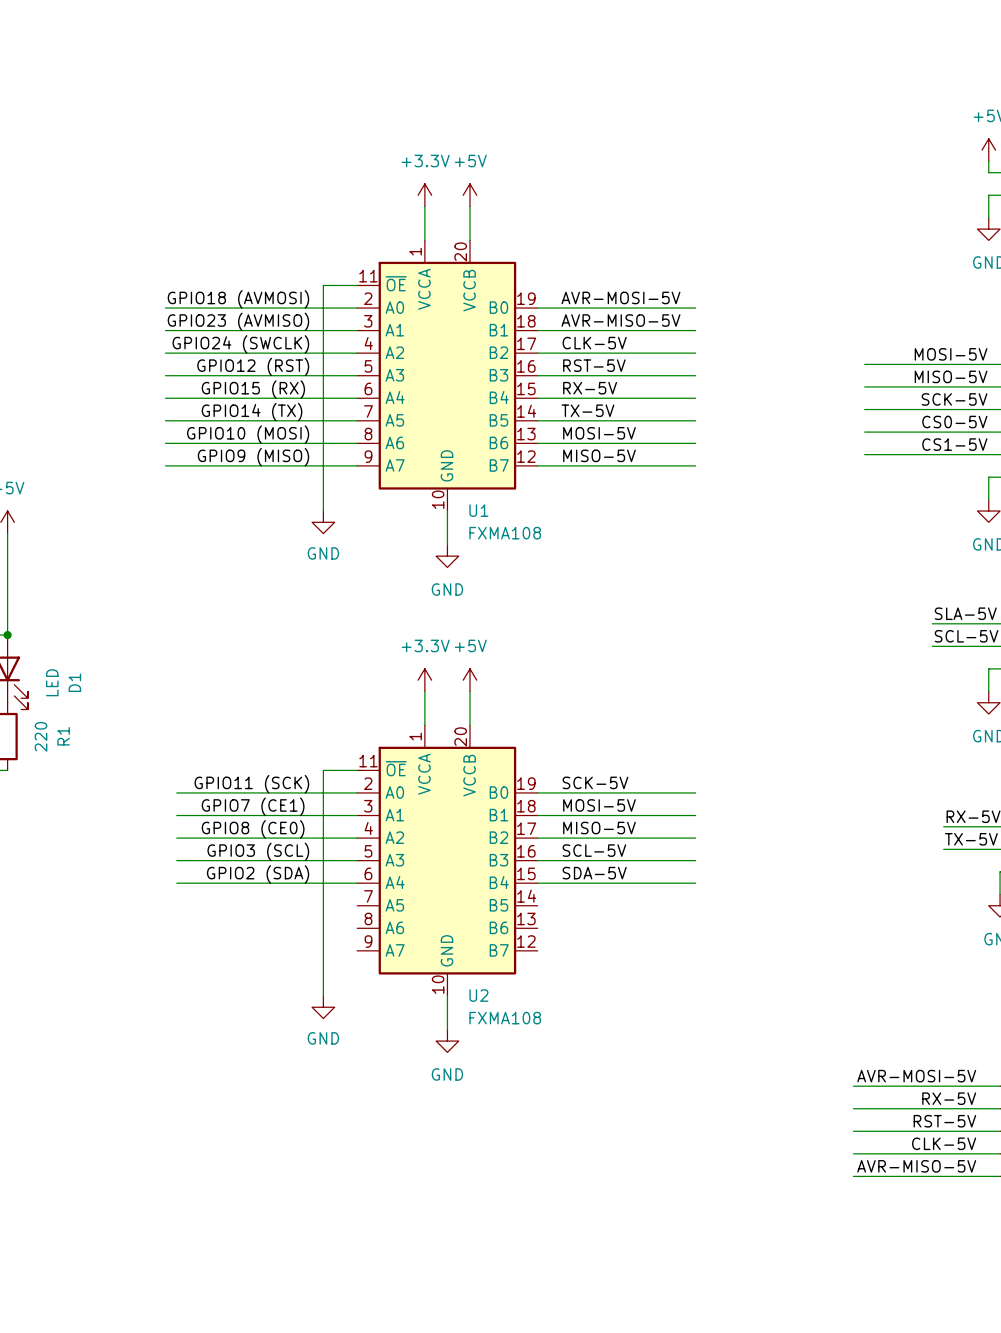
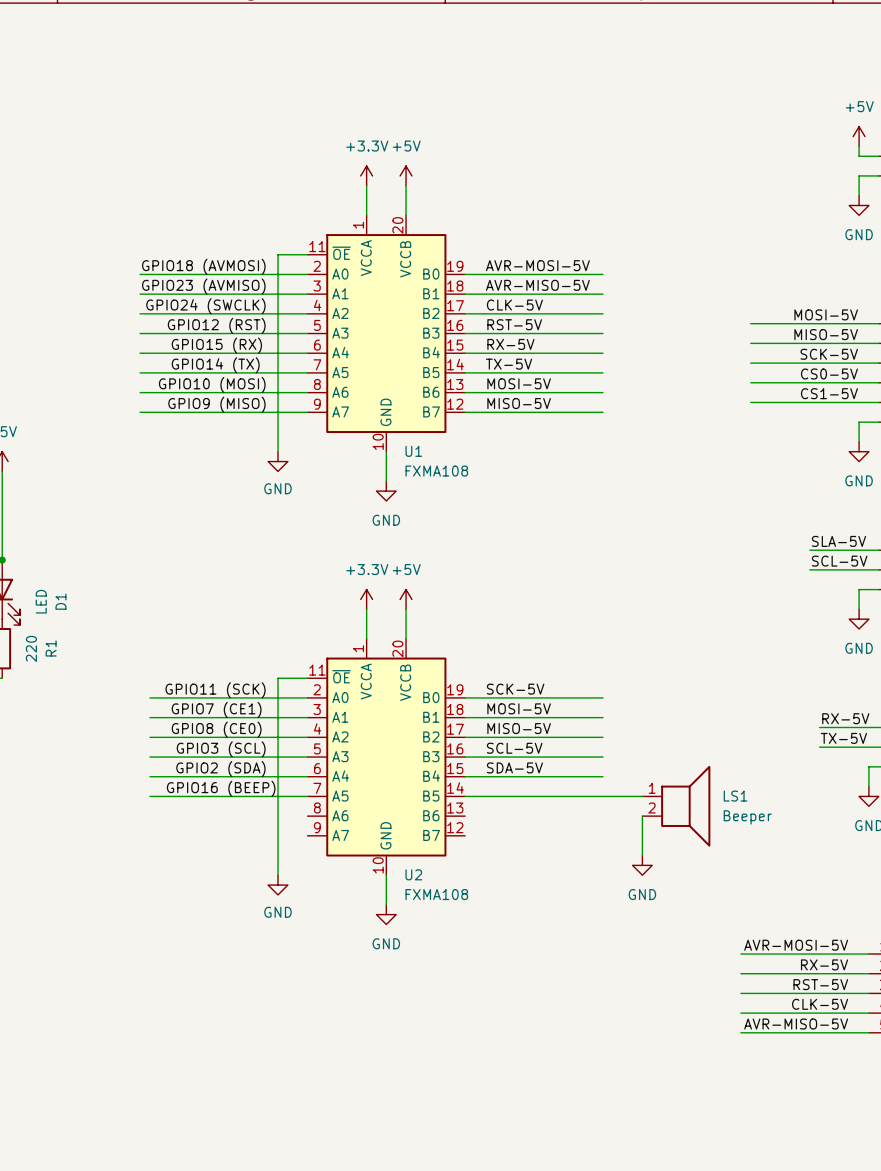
label: none -> GPIO16 (BEEP) (221, 788)
wire: none -> (149, 796) (307, 796)
wire: none -> (465, 796) (642, 796)
LS1: none -> Beeper (676, 806)
wire: none -> (642, 816) (642, 855)
power symbol: none -> GND (642, 865)

